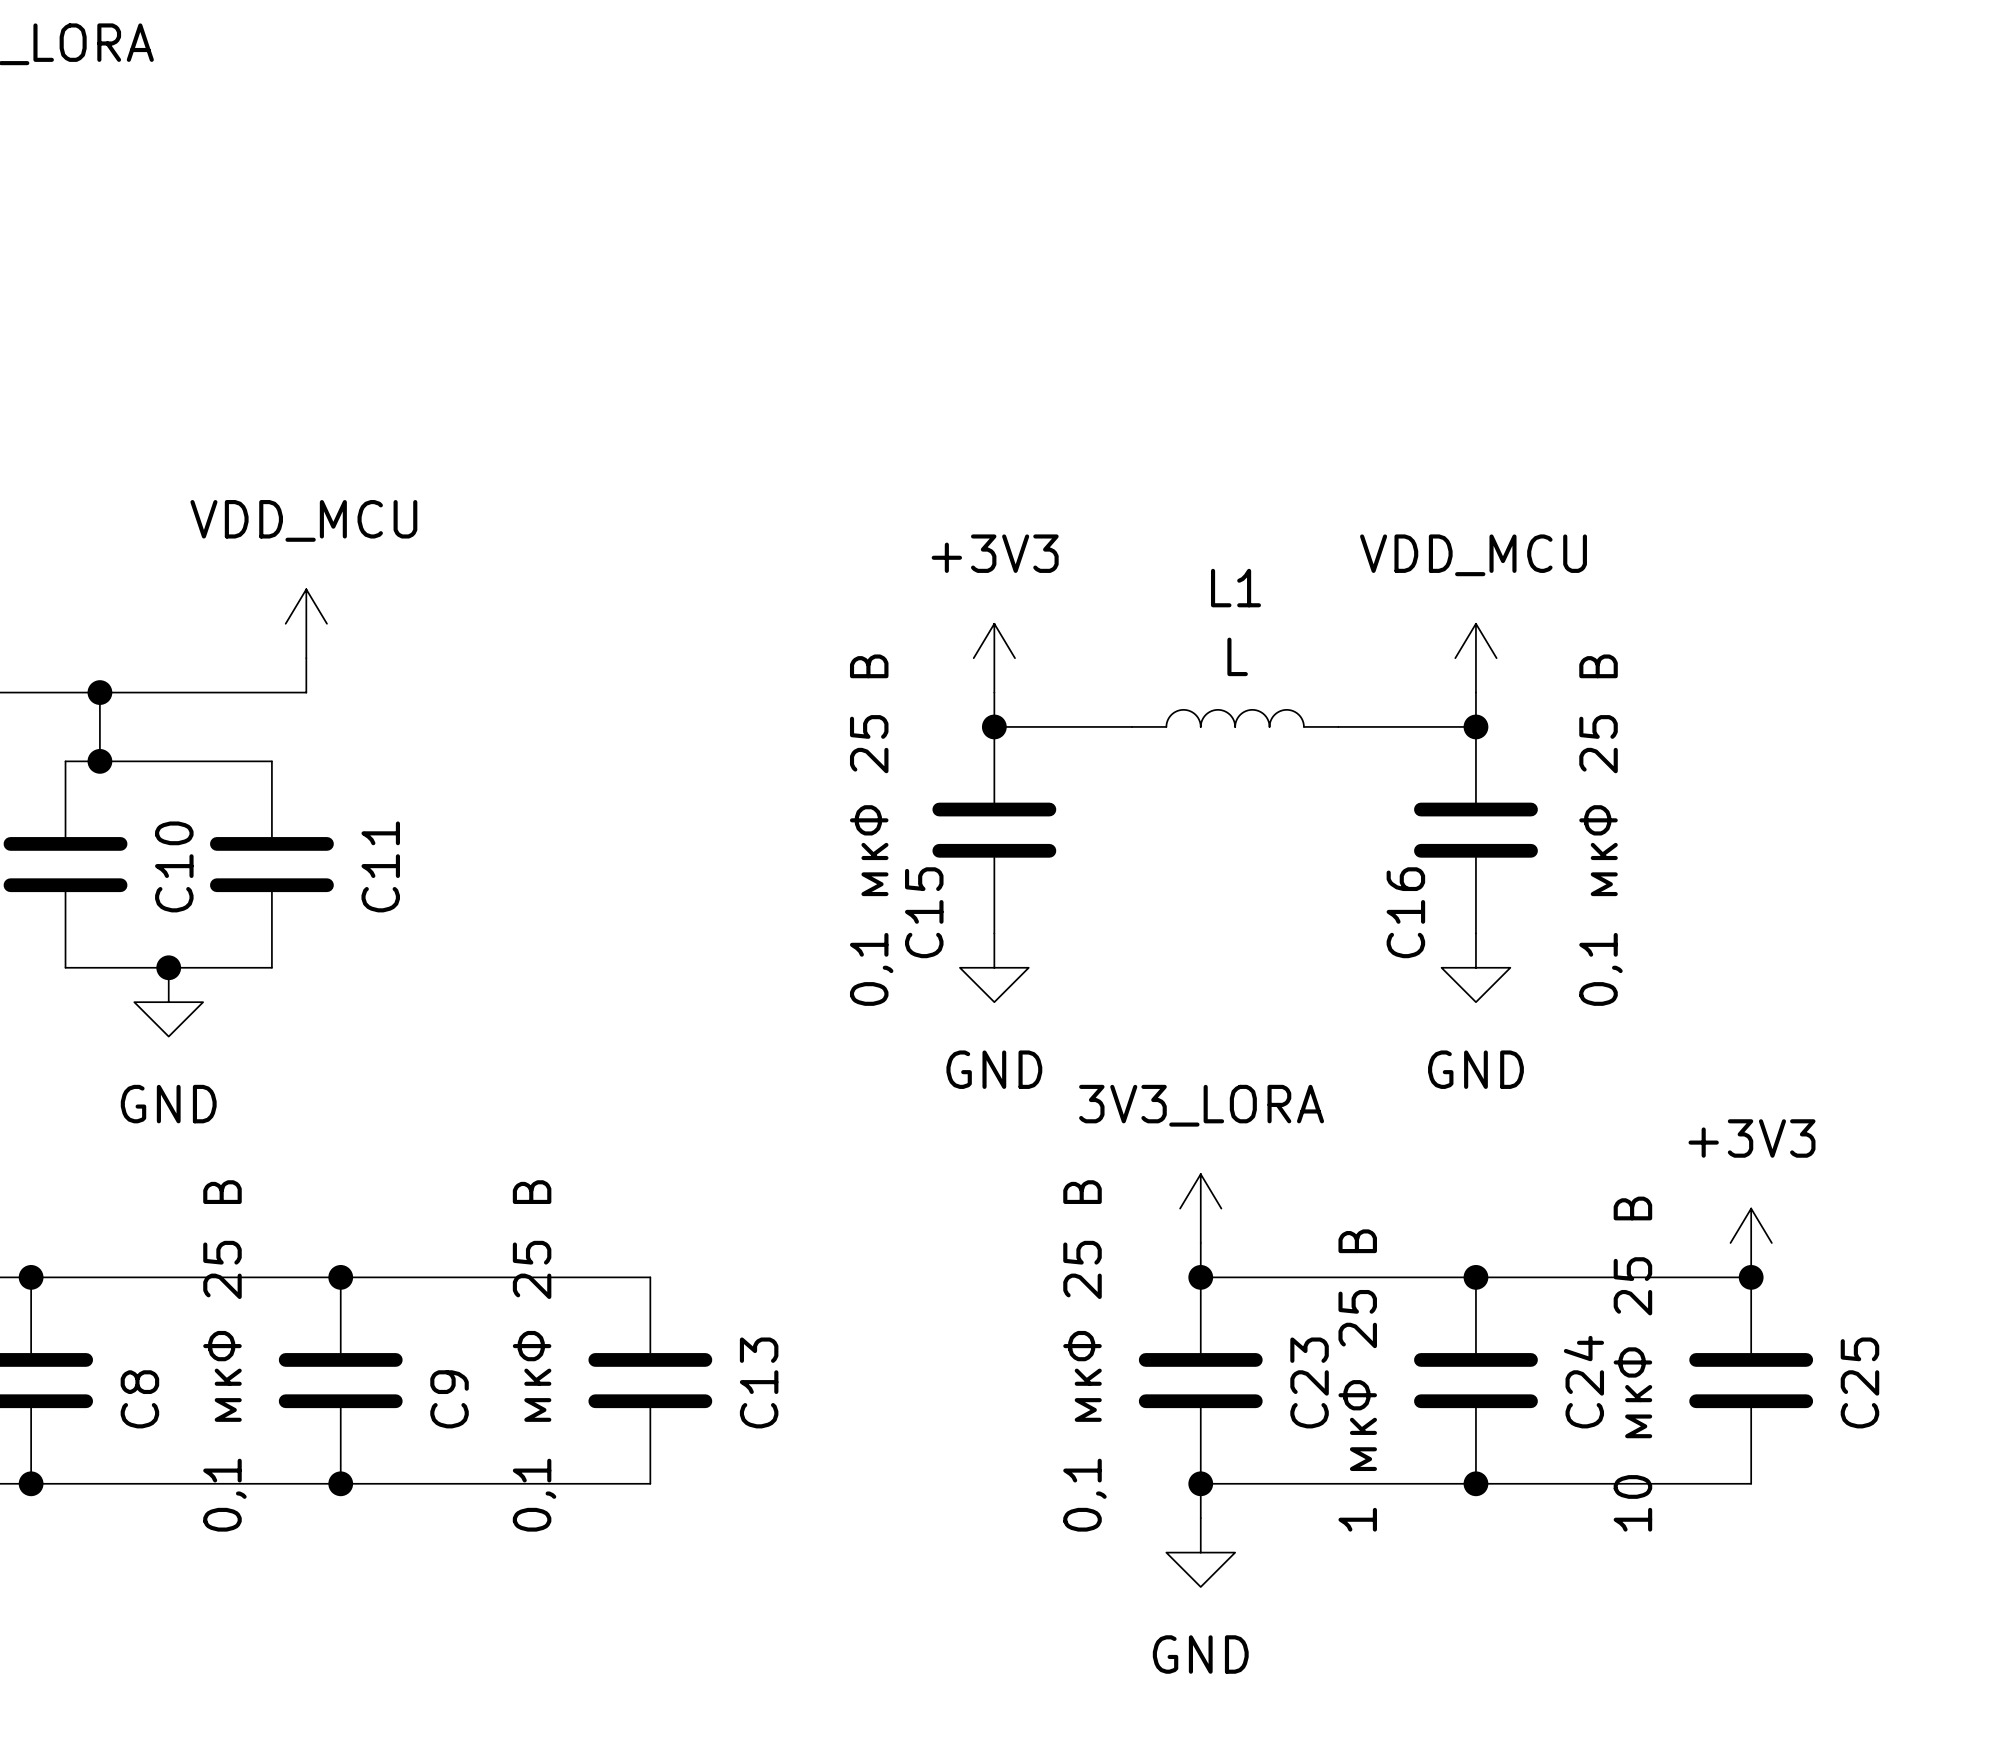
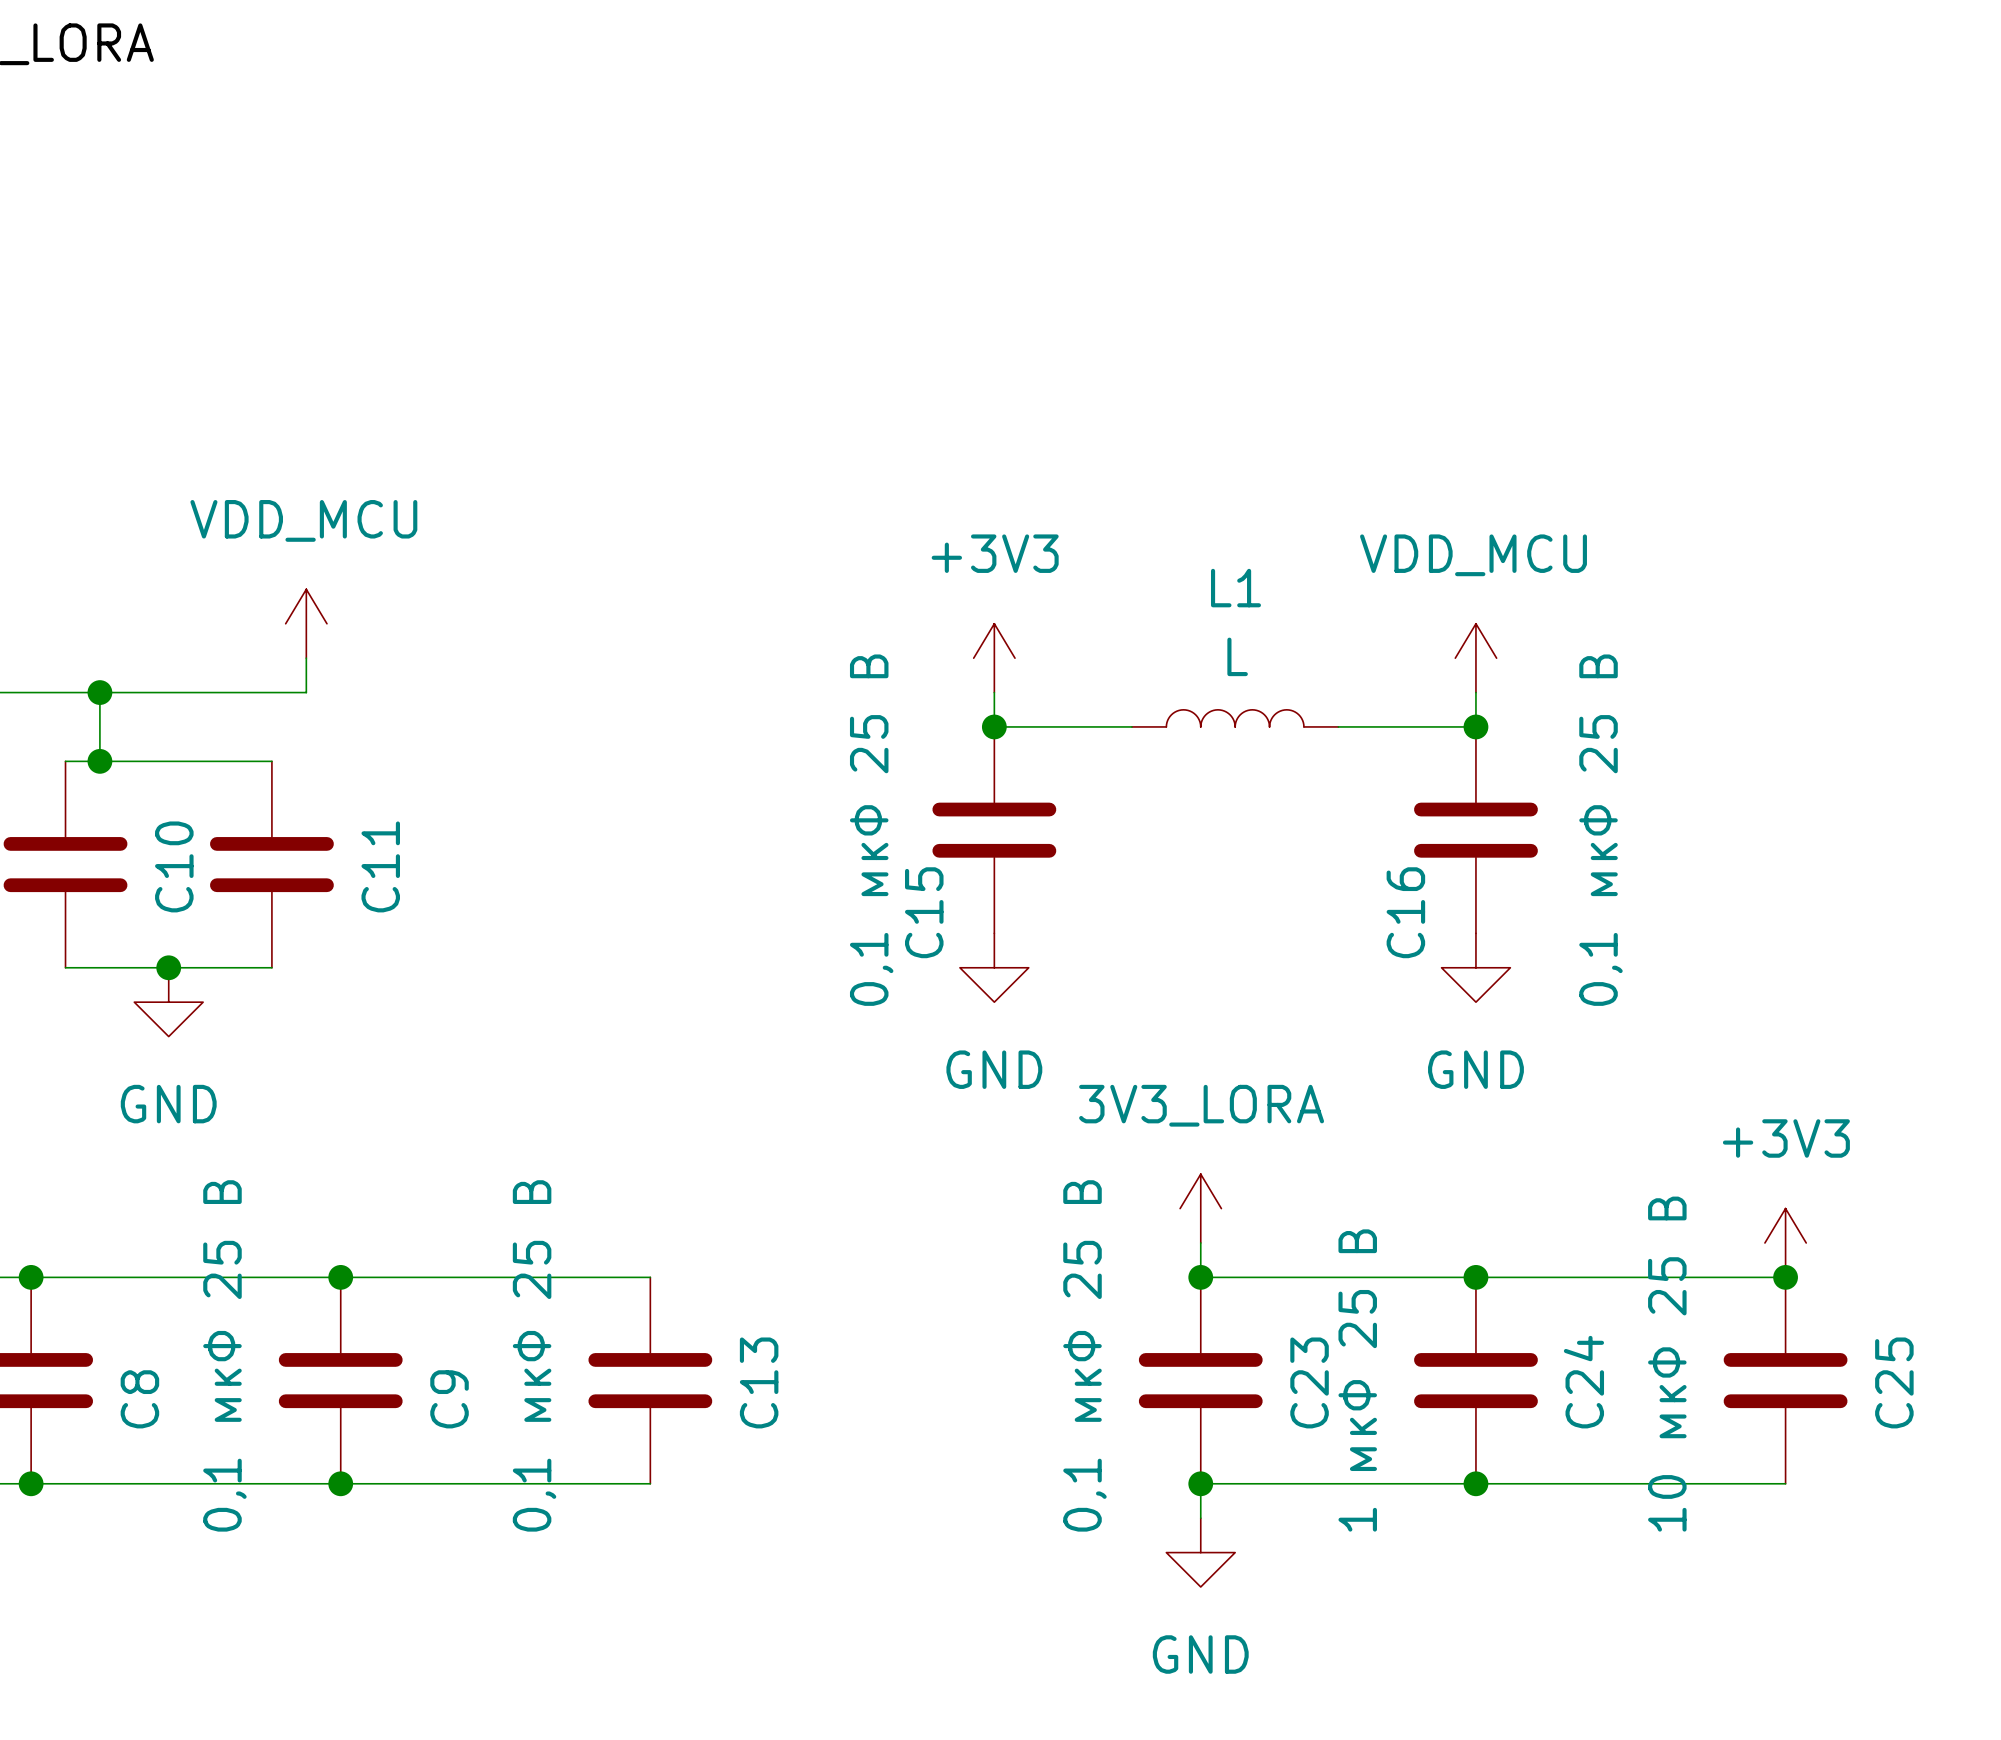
power symbol position: +3V3 (1751, 1242) -> +3V3 (1785, 1242)
wire: none -> (1751, 1277) (1785, 1277)
junction position: (1751, 1277) -> (1785, 1277)
C25 position: (1751, 1380) -> (1785, 1380)
wire: none -> (1751, 1483) (1785, 1483)

